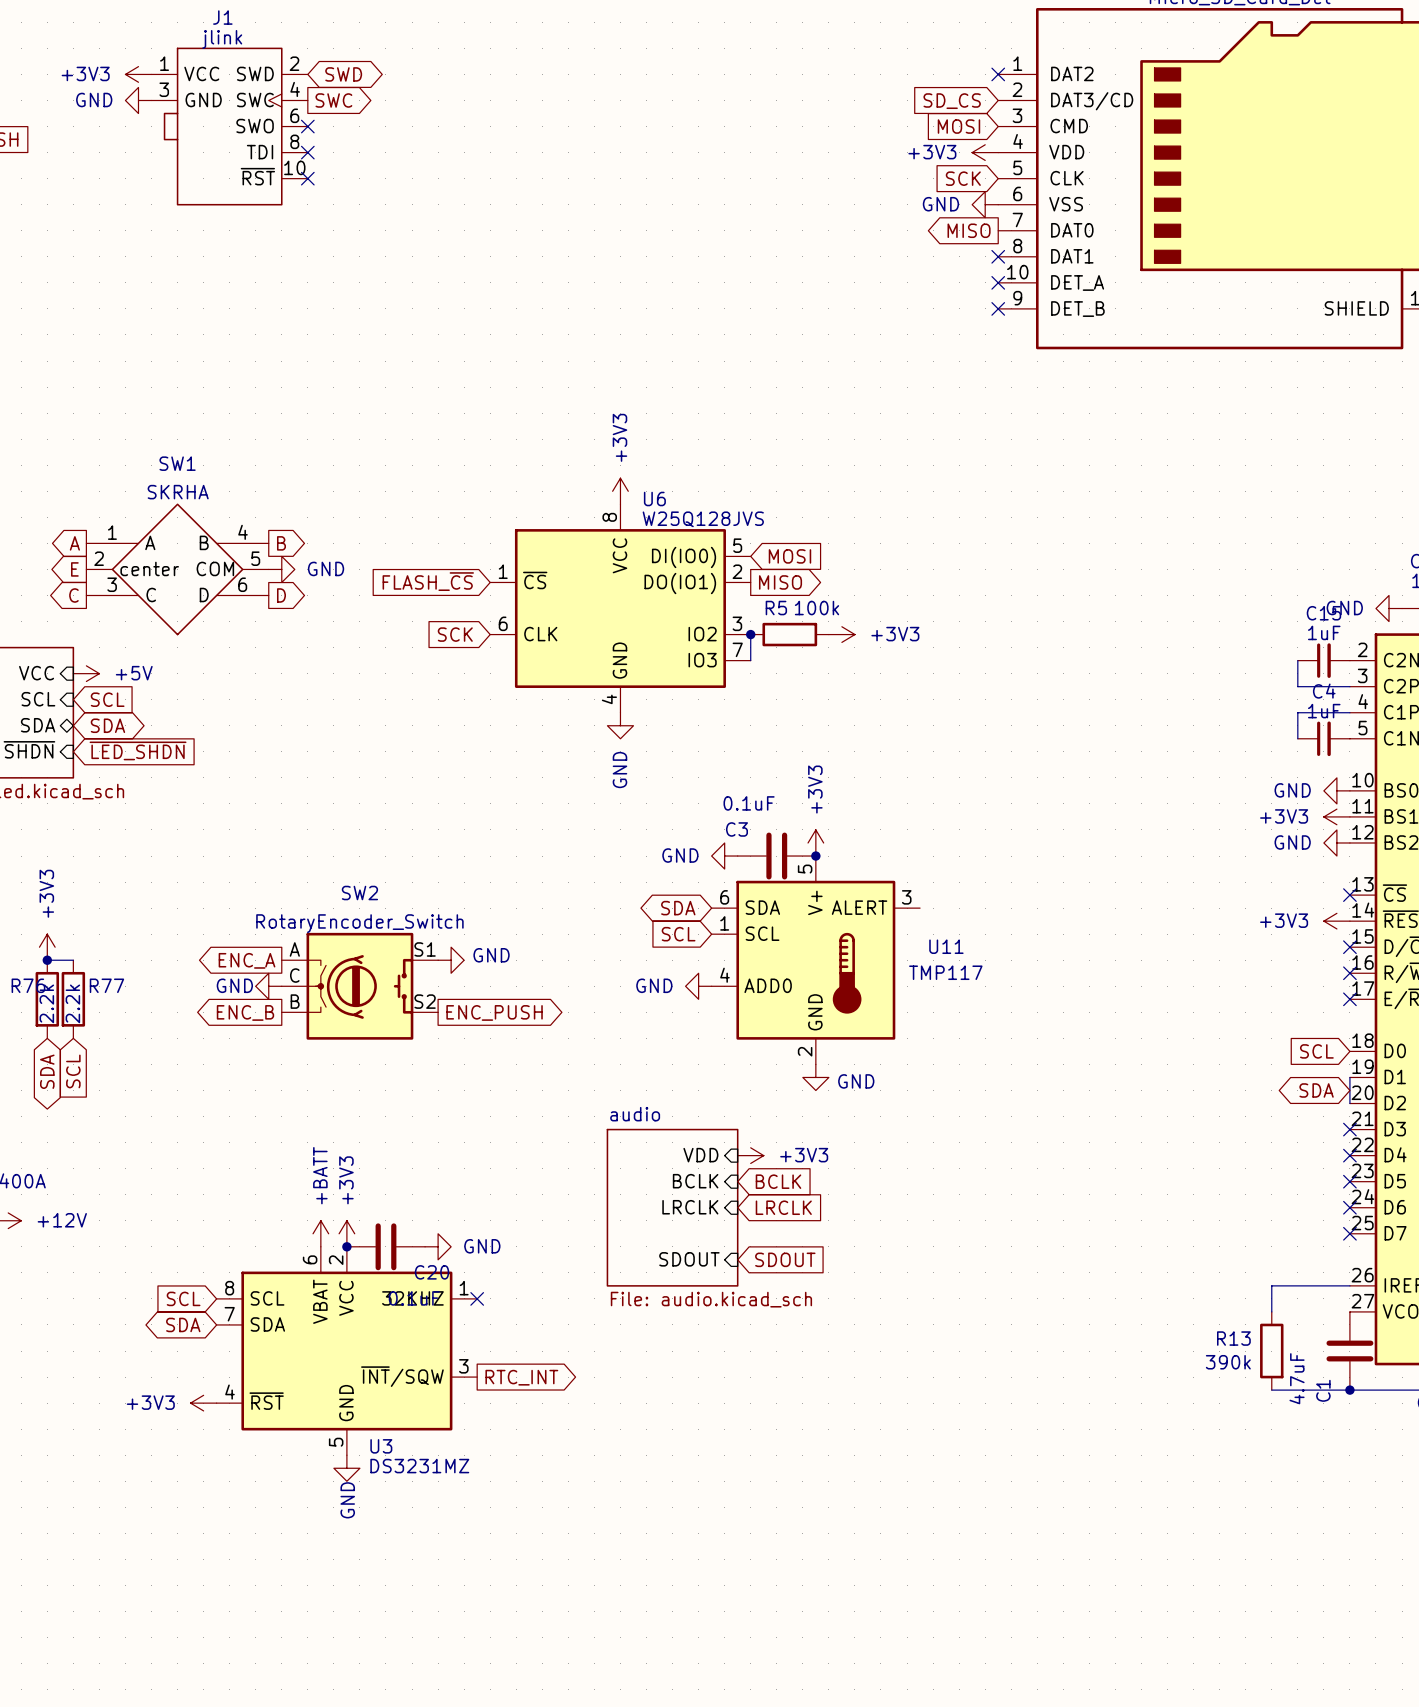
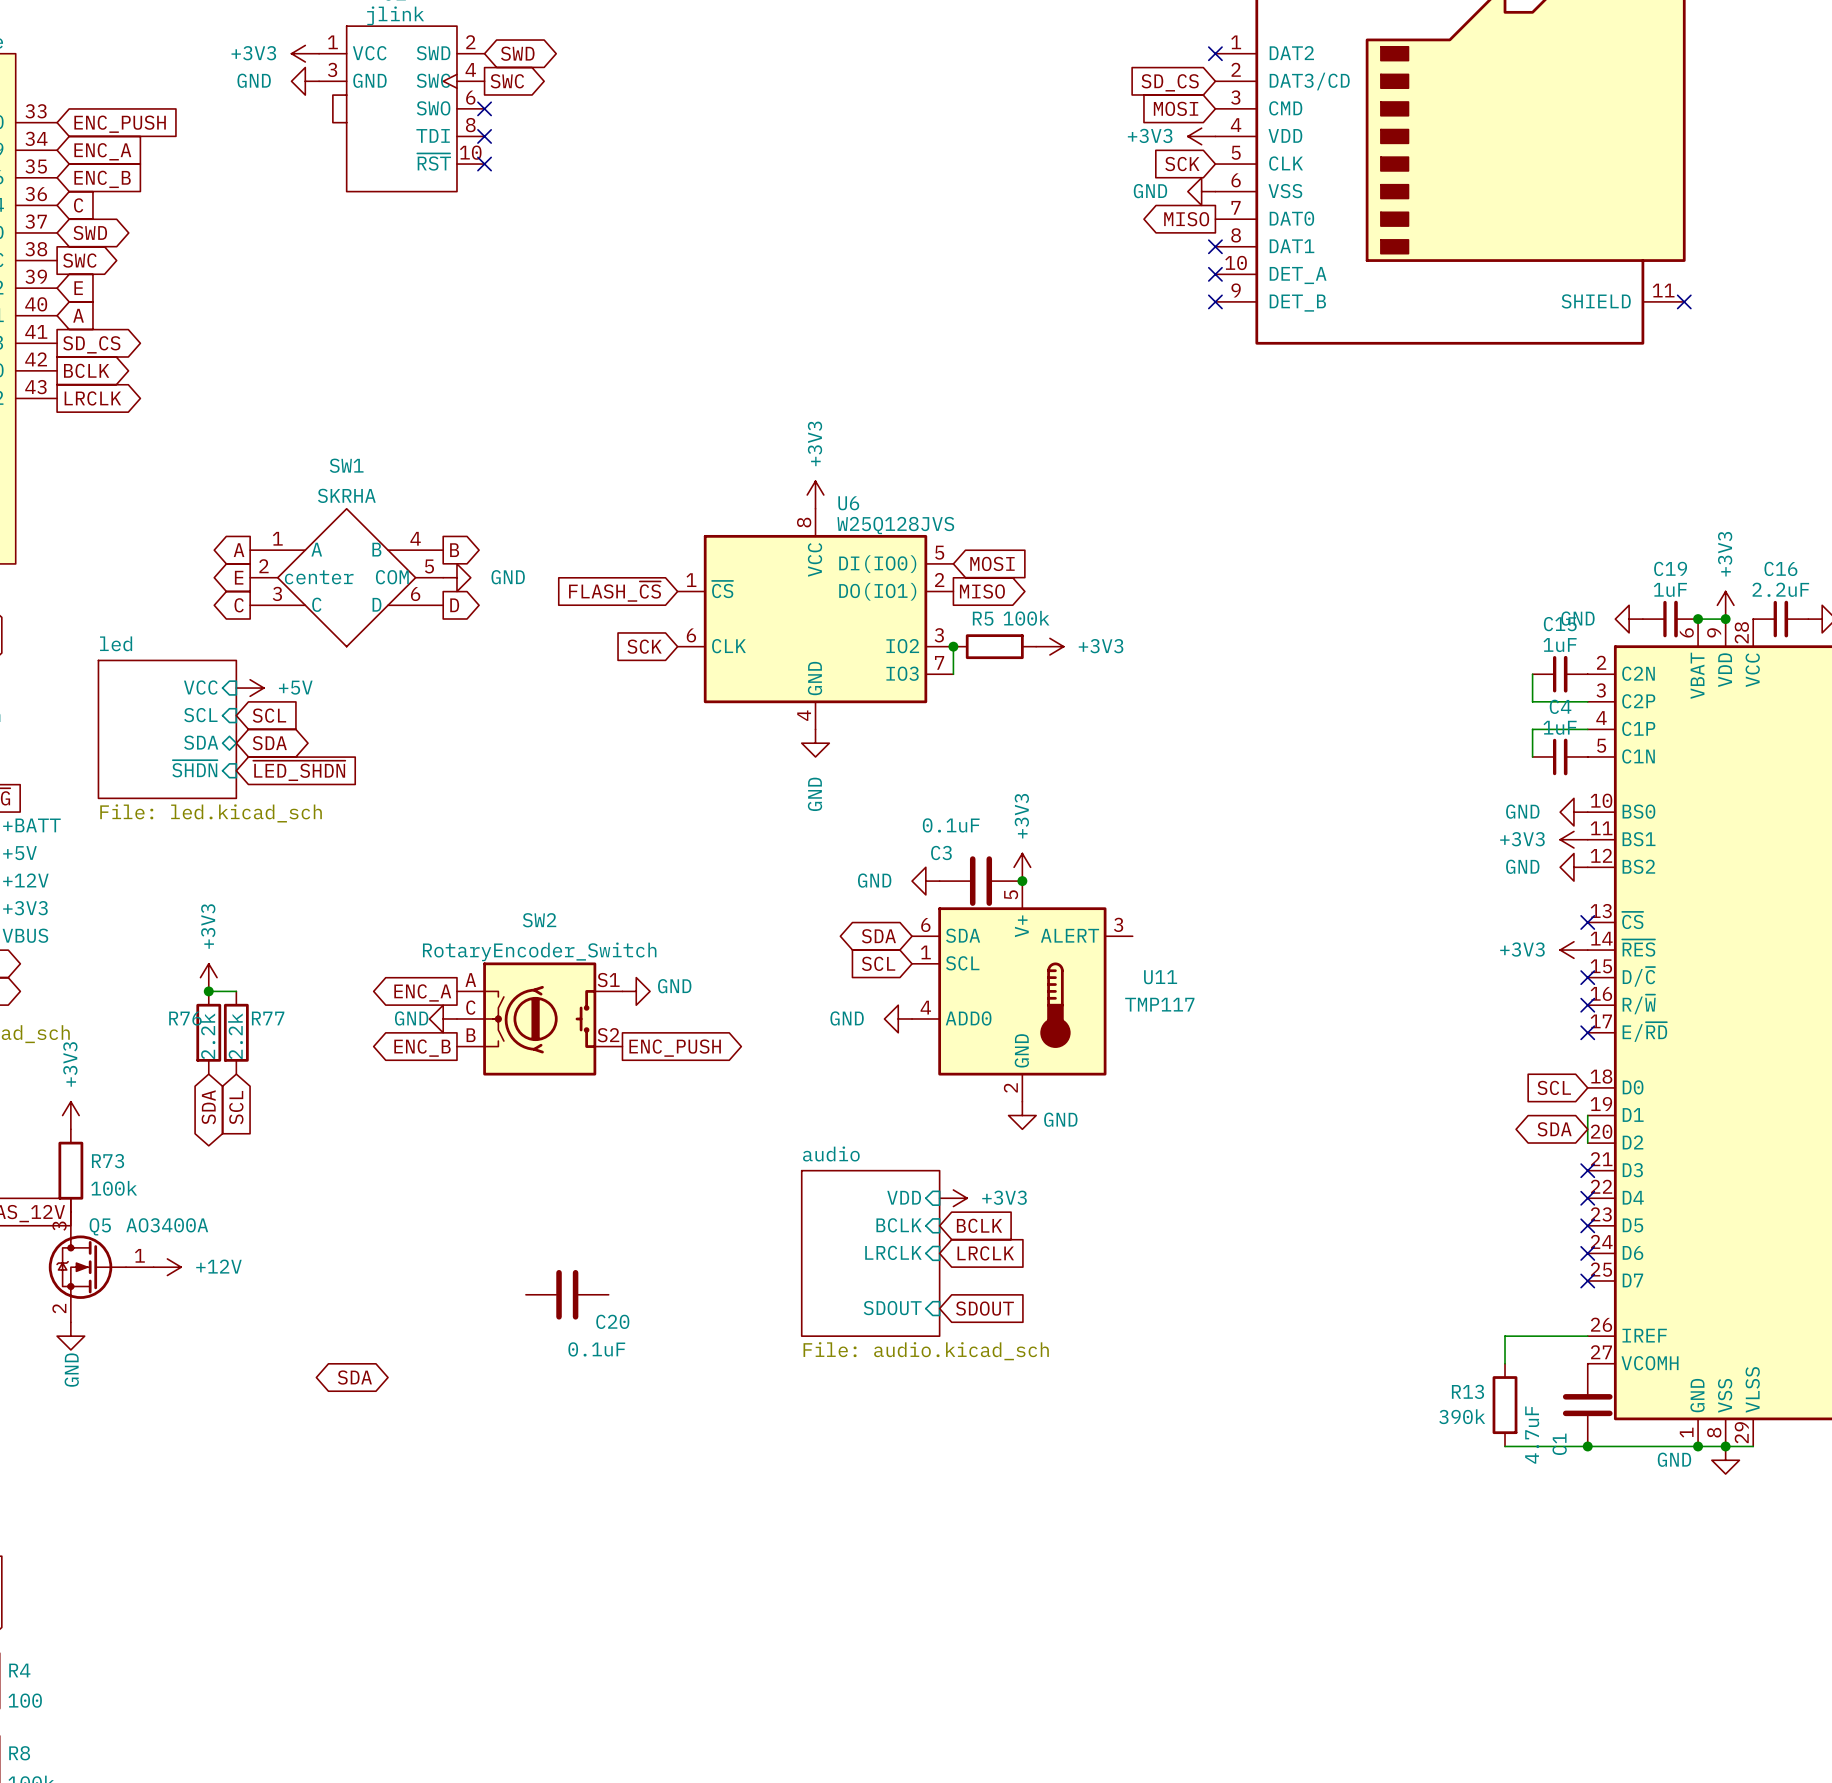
power symbol: +BATT (320, 1233) -> none
power symbol: +3V3 (346, 1233) -> none
junction: (346, 1246) -> none
power symbol: GND (438, 1246) -> none
global label: SCL (183, 1298) -> none
no-connect mark: (477, 1298) -> none
U3: DS3231MZ (346, 1351) -> none
global label: RTC_INT (521, 1377) -> none
power symbol: +3V3 (203, 1403) -> none
power symbol: GND (346, 1468) -> none

